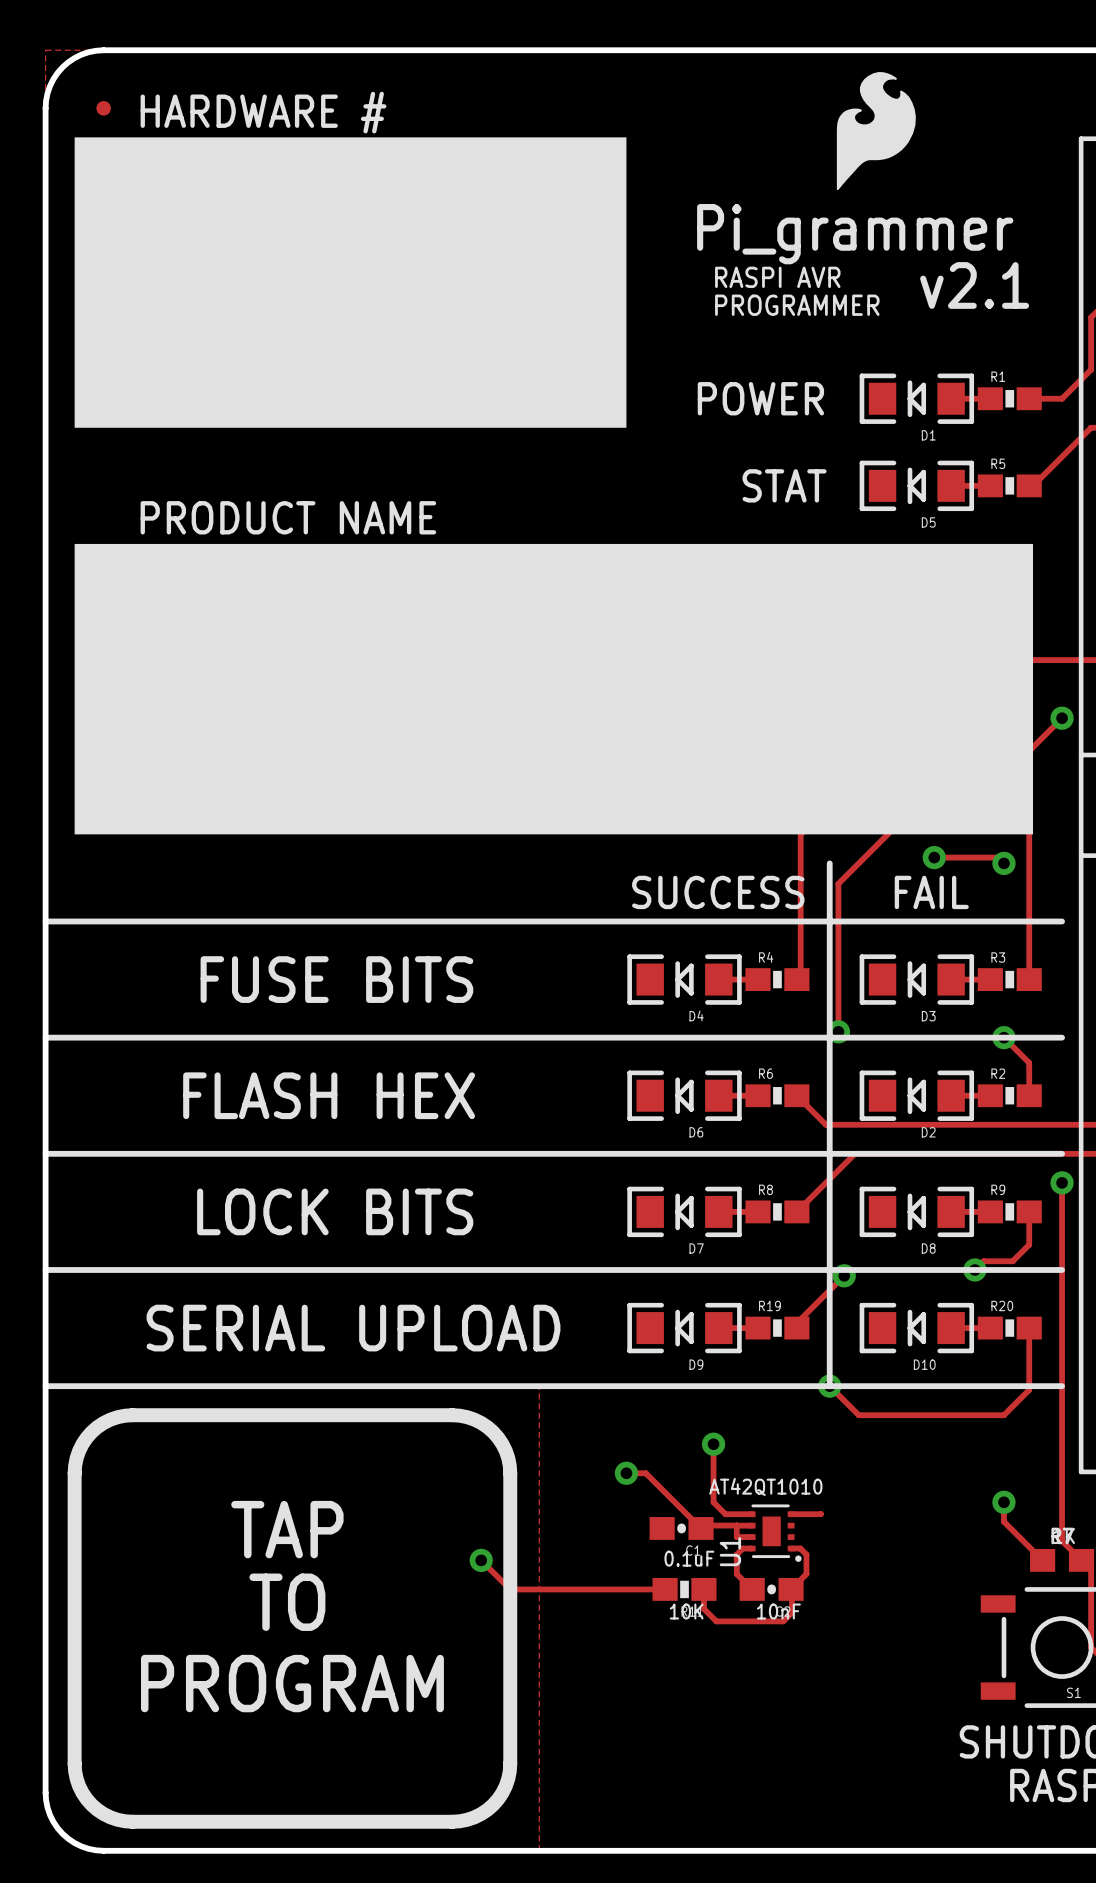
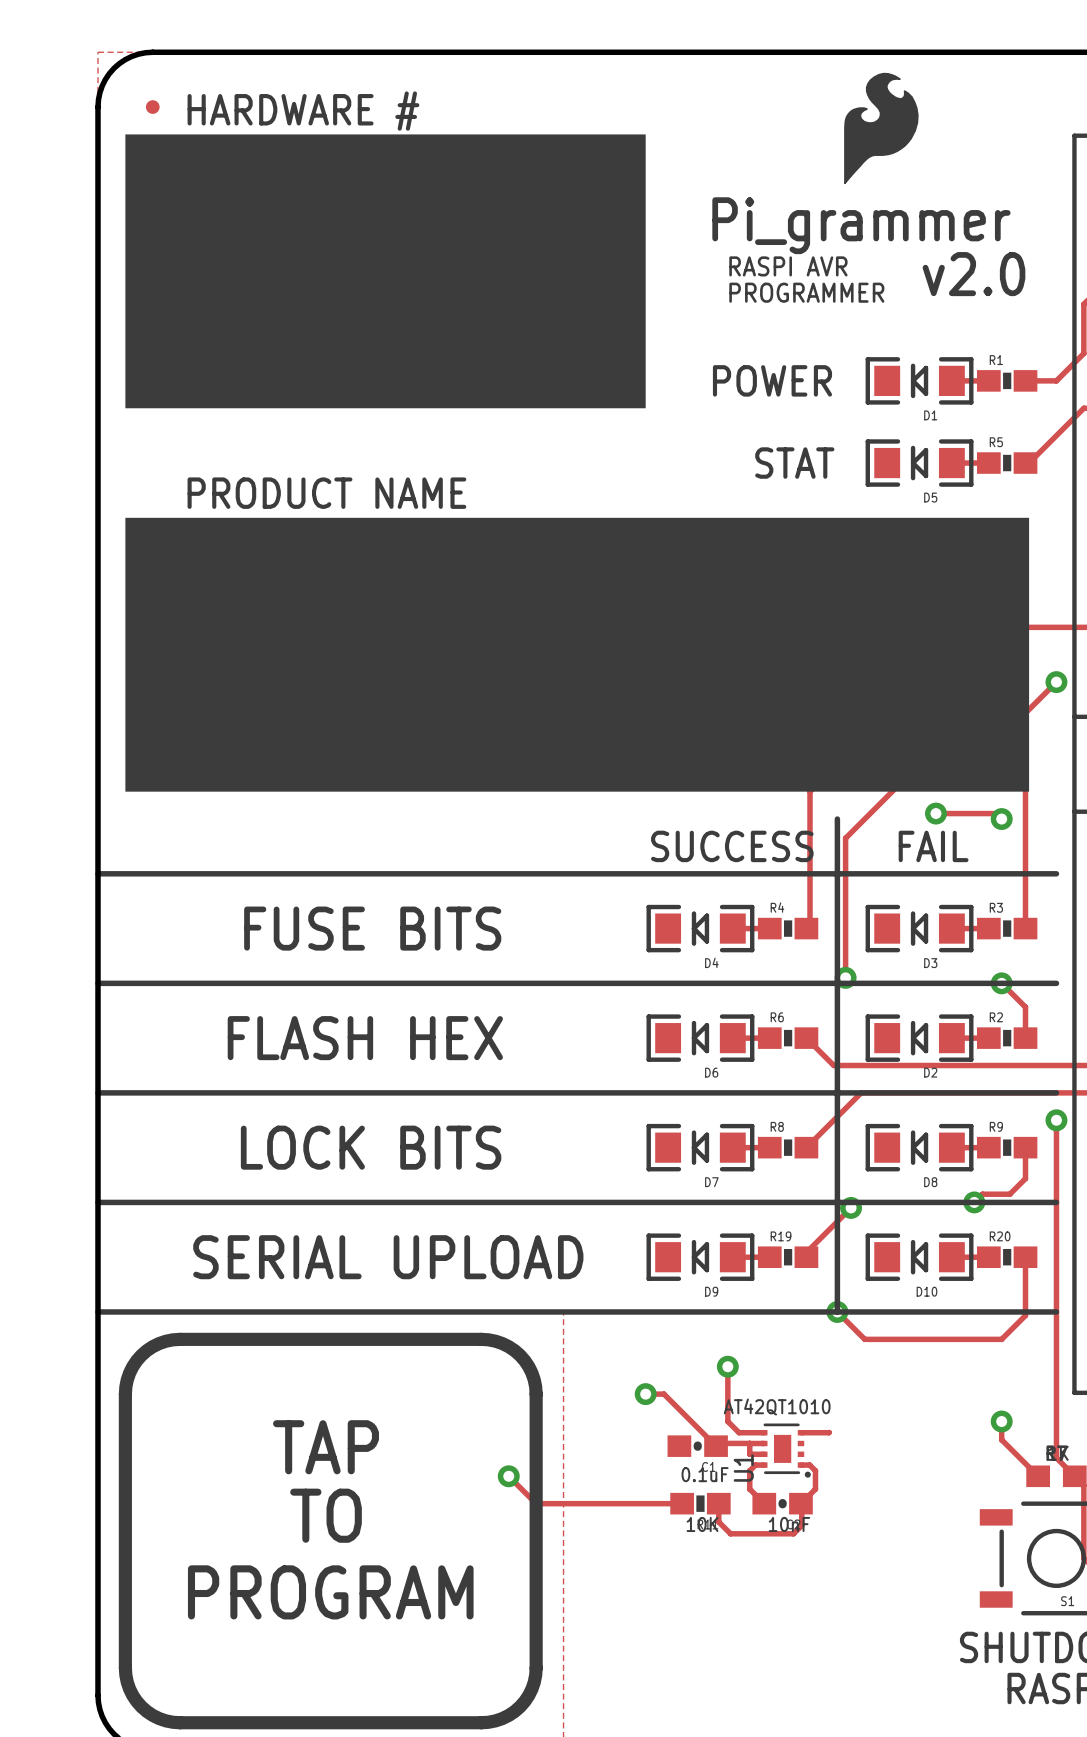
text: v2.1 (974, 285) -> v2.0 (973, 274)

